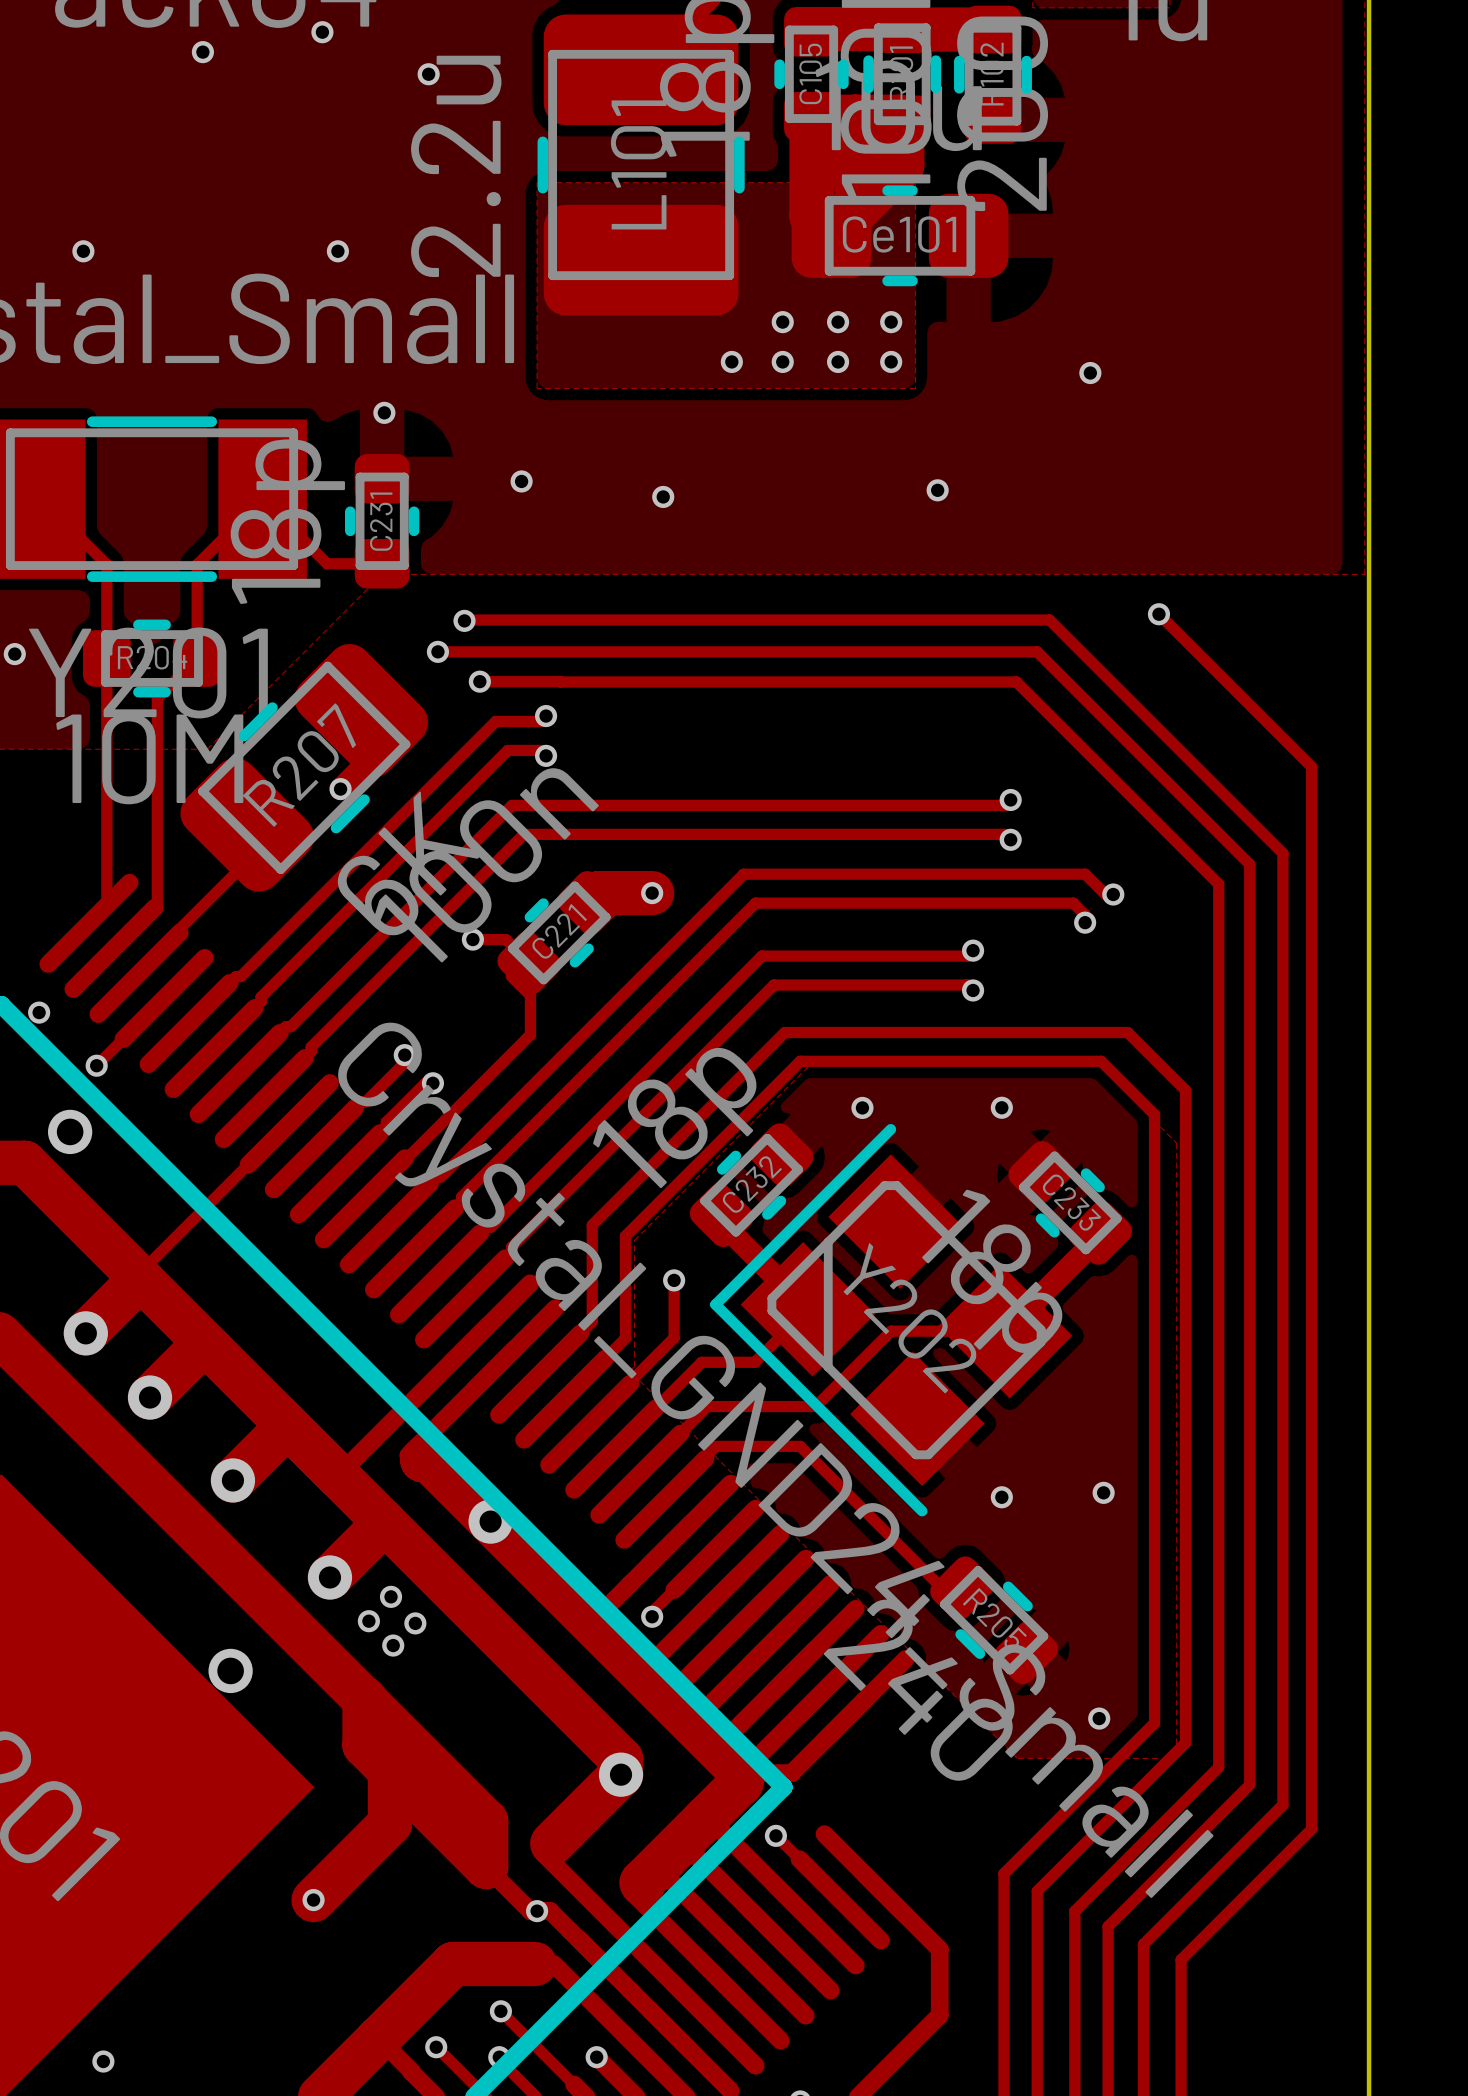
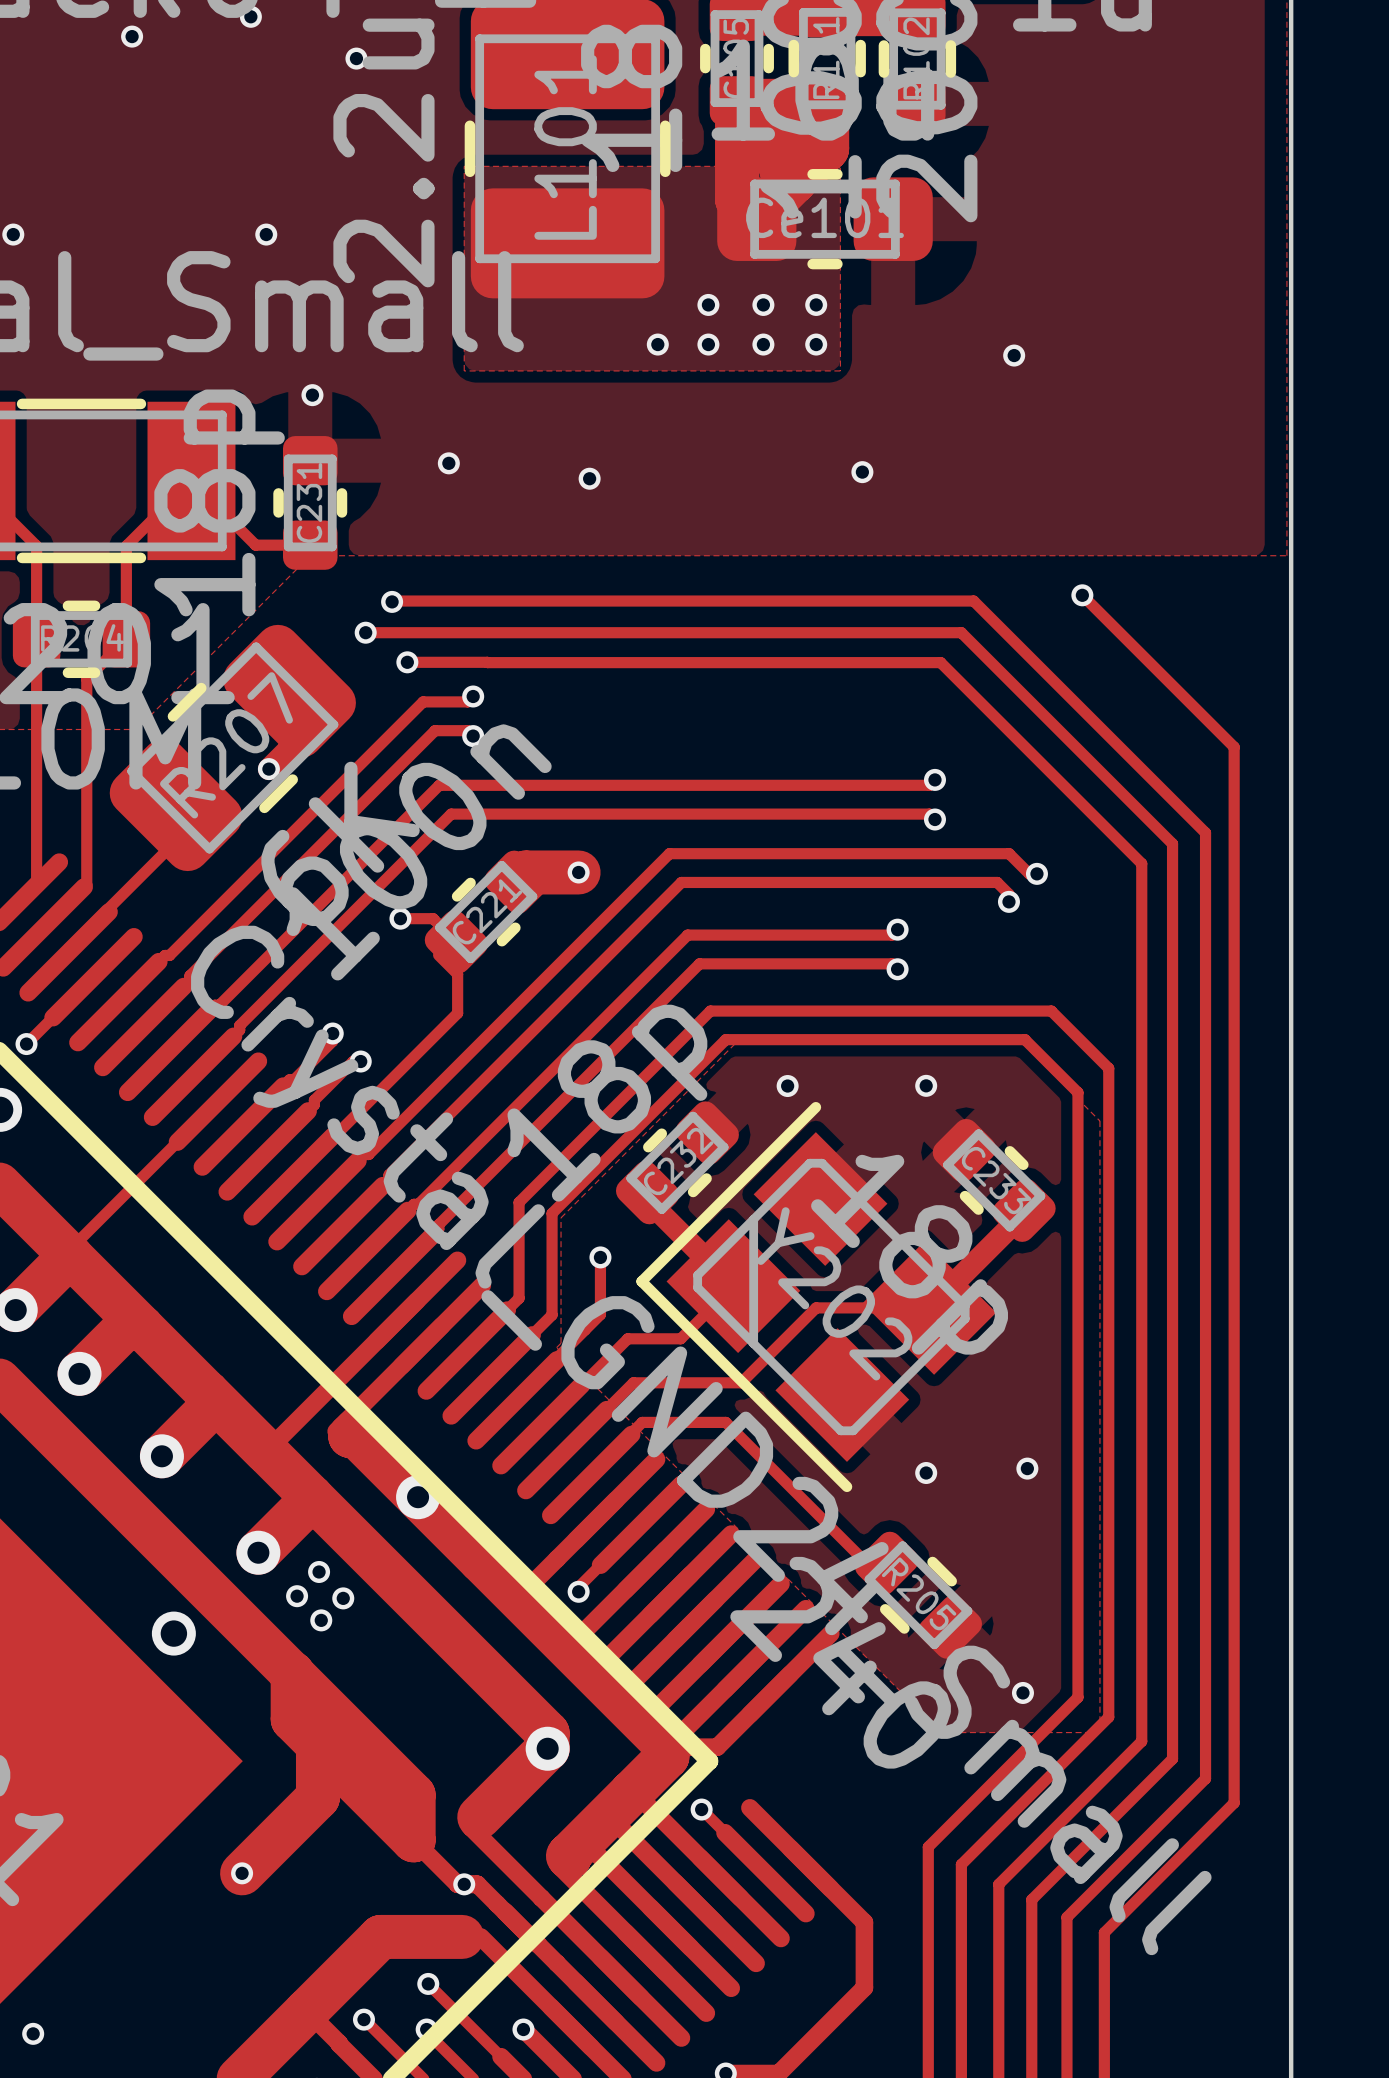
via position: (230, 1670) -> (173, 1633)

